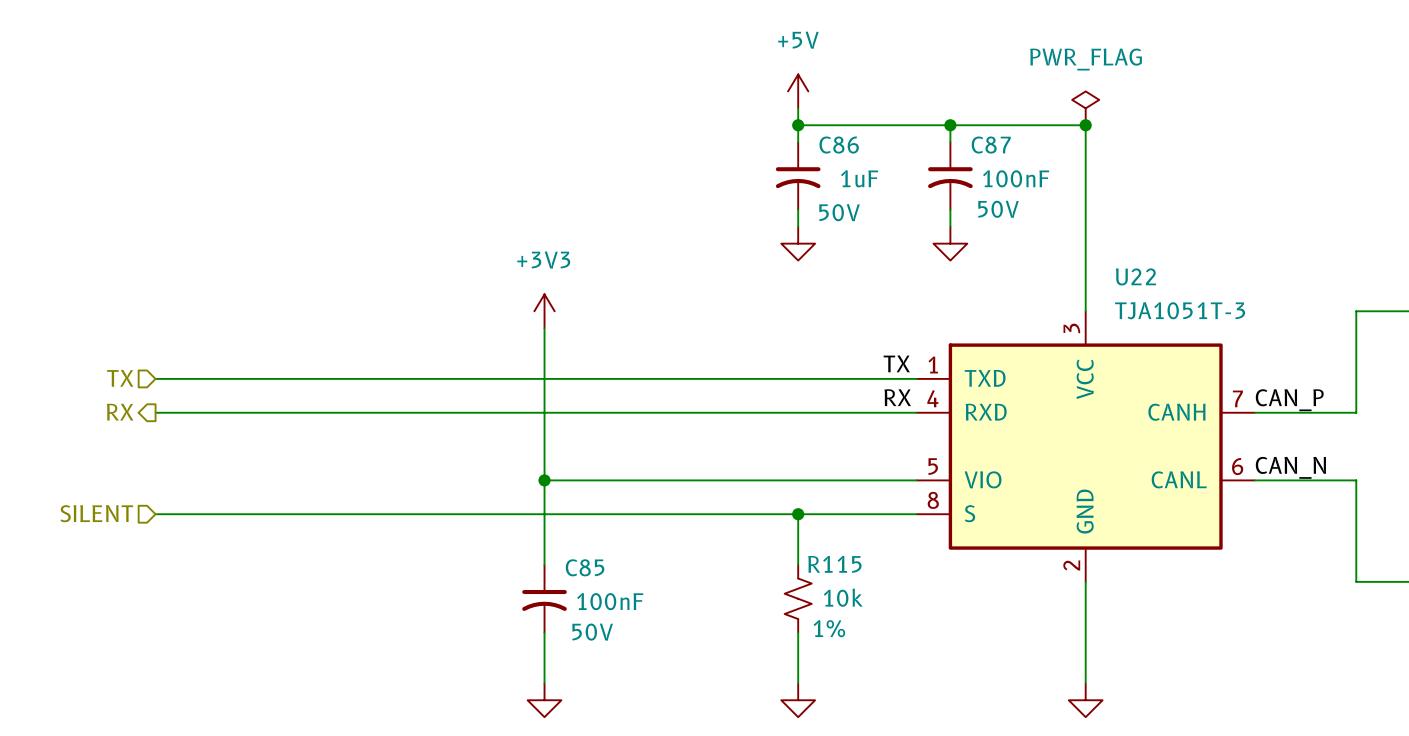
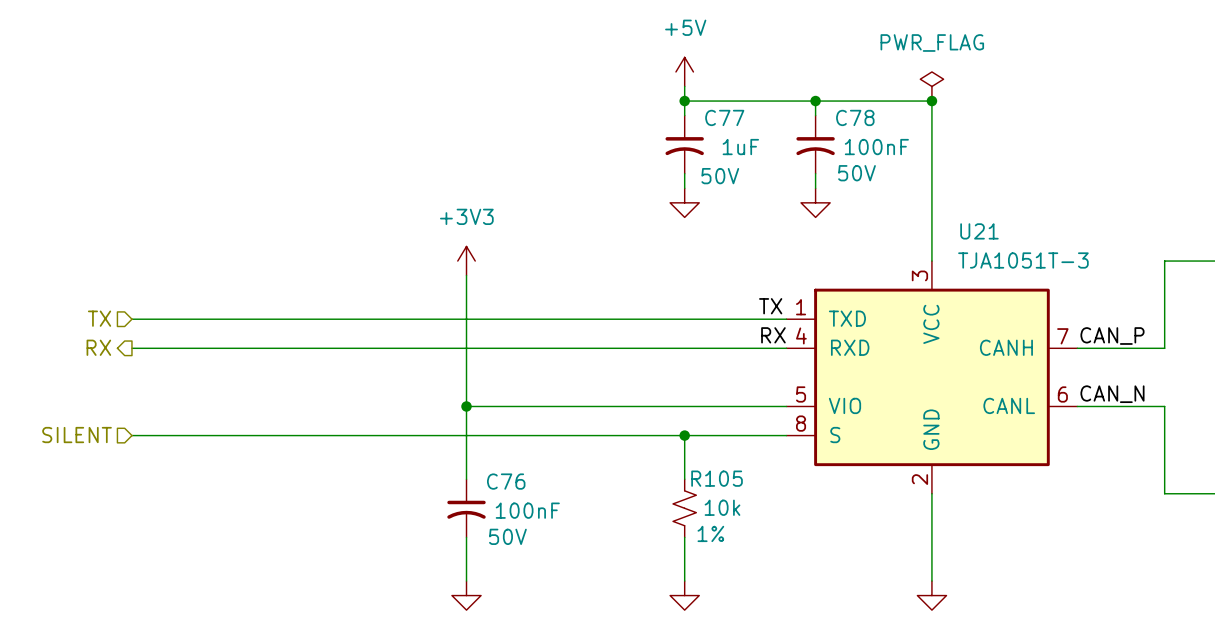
C86 name: C86 (839, 145) -> C77 (724, 117)
C87 name: C87 (991, 145) -> C78 (855, 117)
U22 name: U22 (1135, 276) -> U21 (979, 231)
R115 name: R115 (834, 564) -> R105 (717, 478)
C85 name: C85 (585, 567) -> C76 (506, 481)

